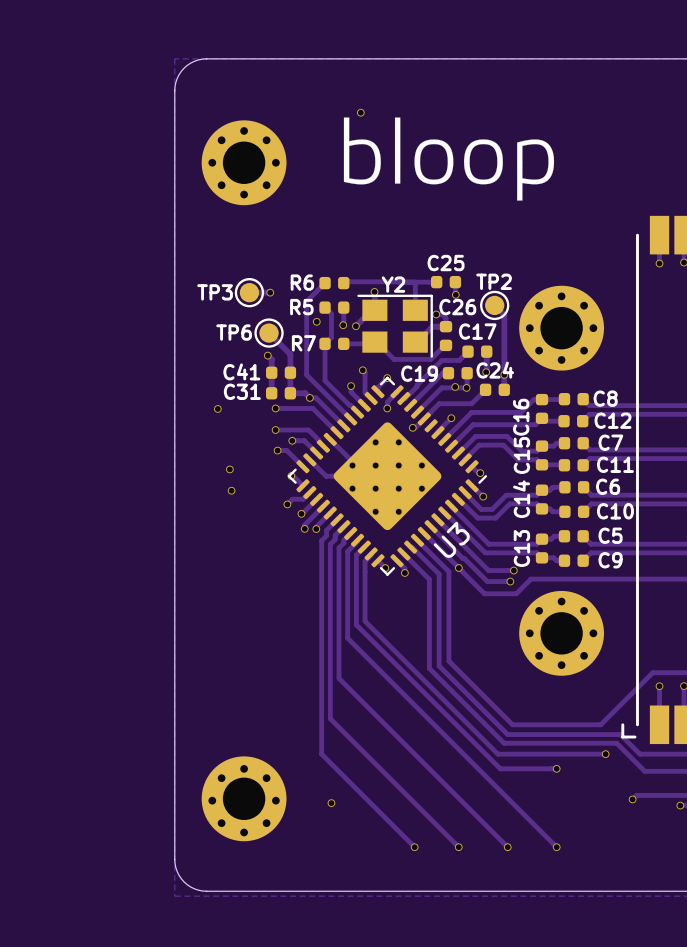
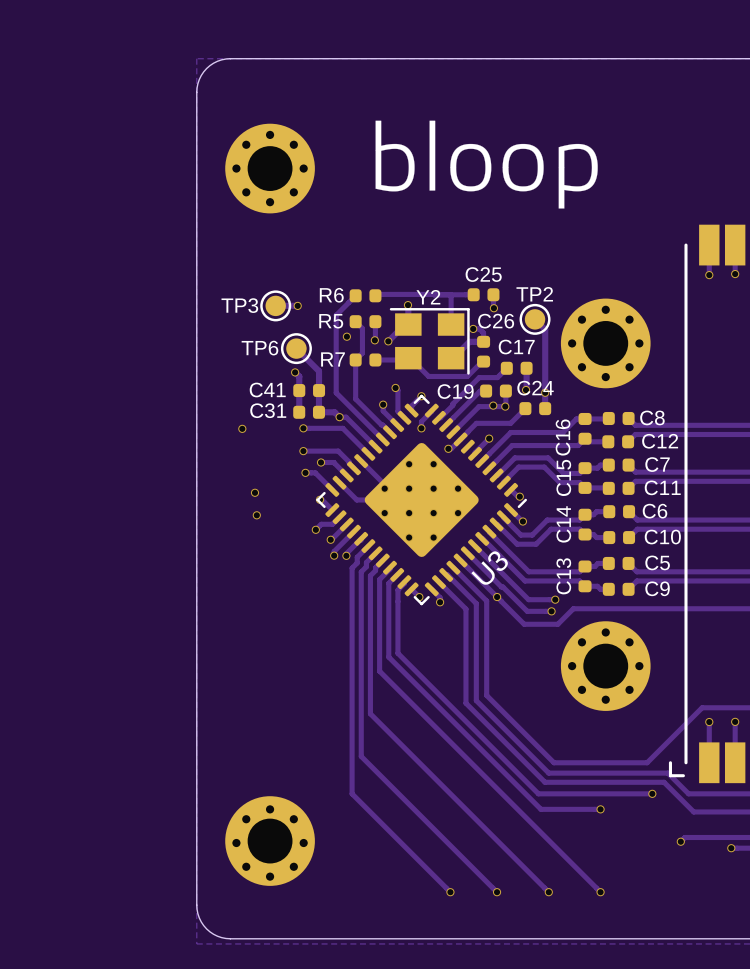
via: (360, 112) -> none
via: (331, 803) -> none

